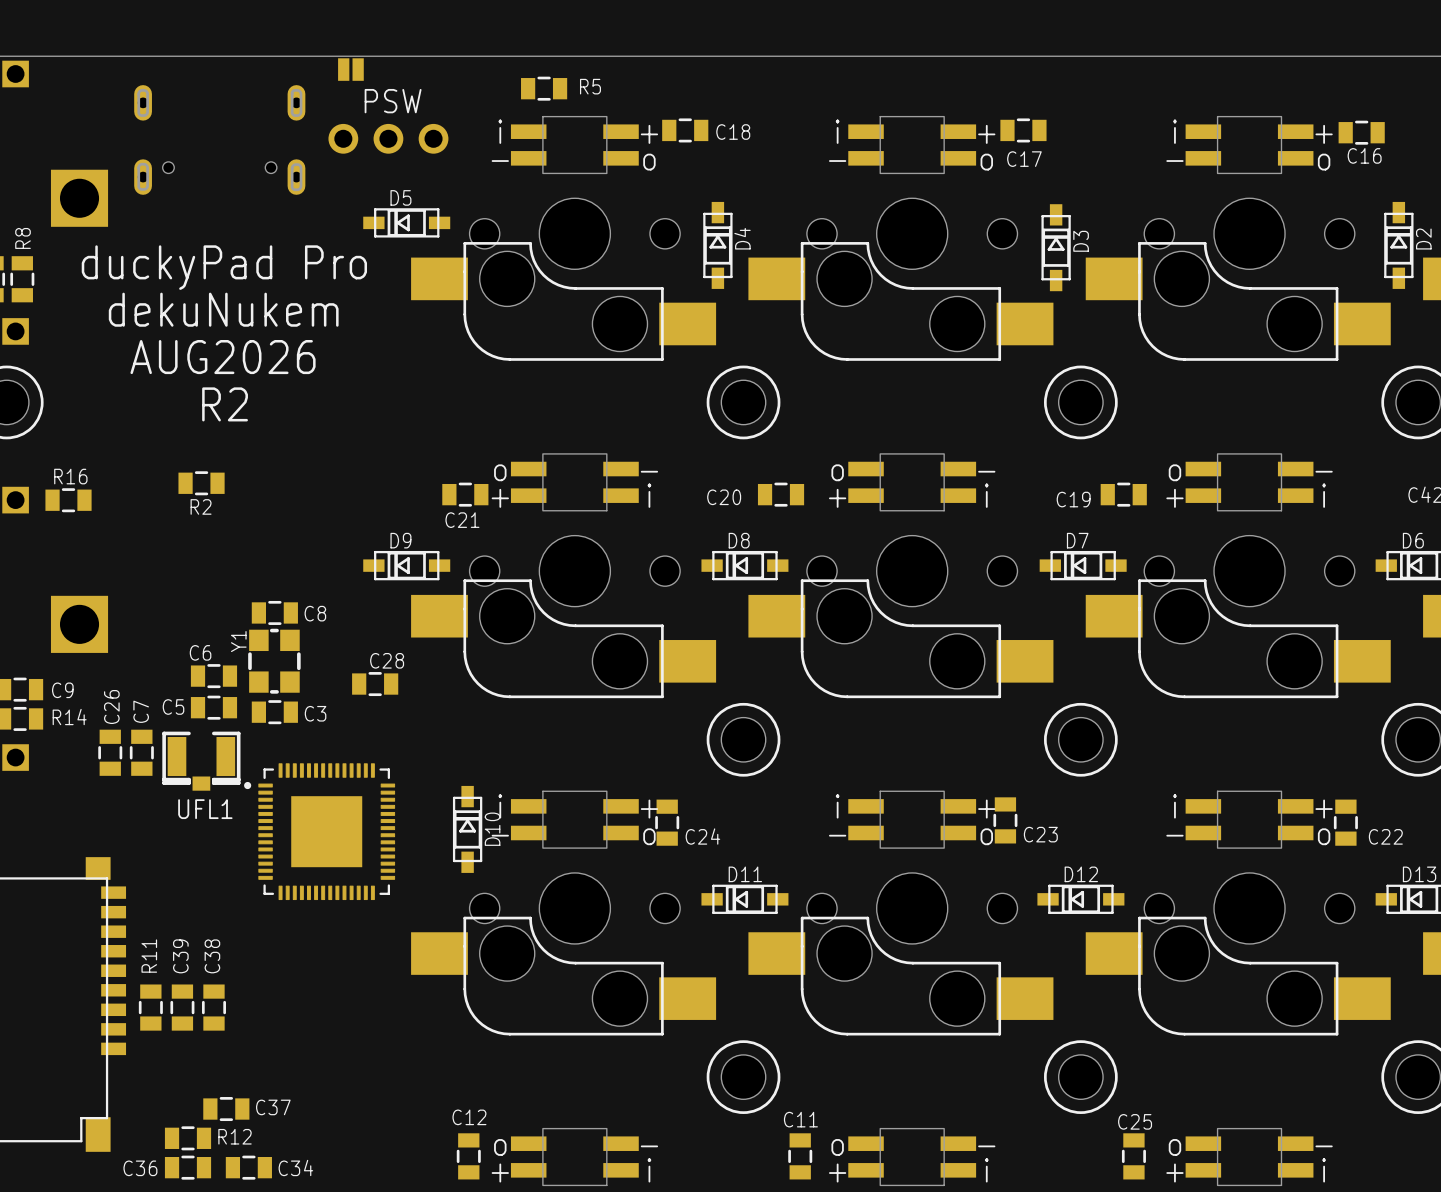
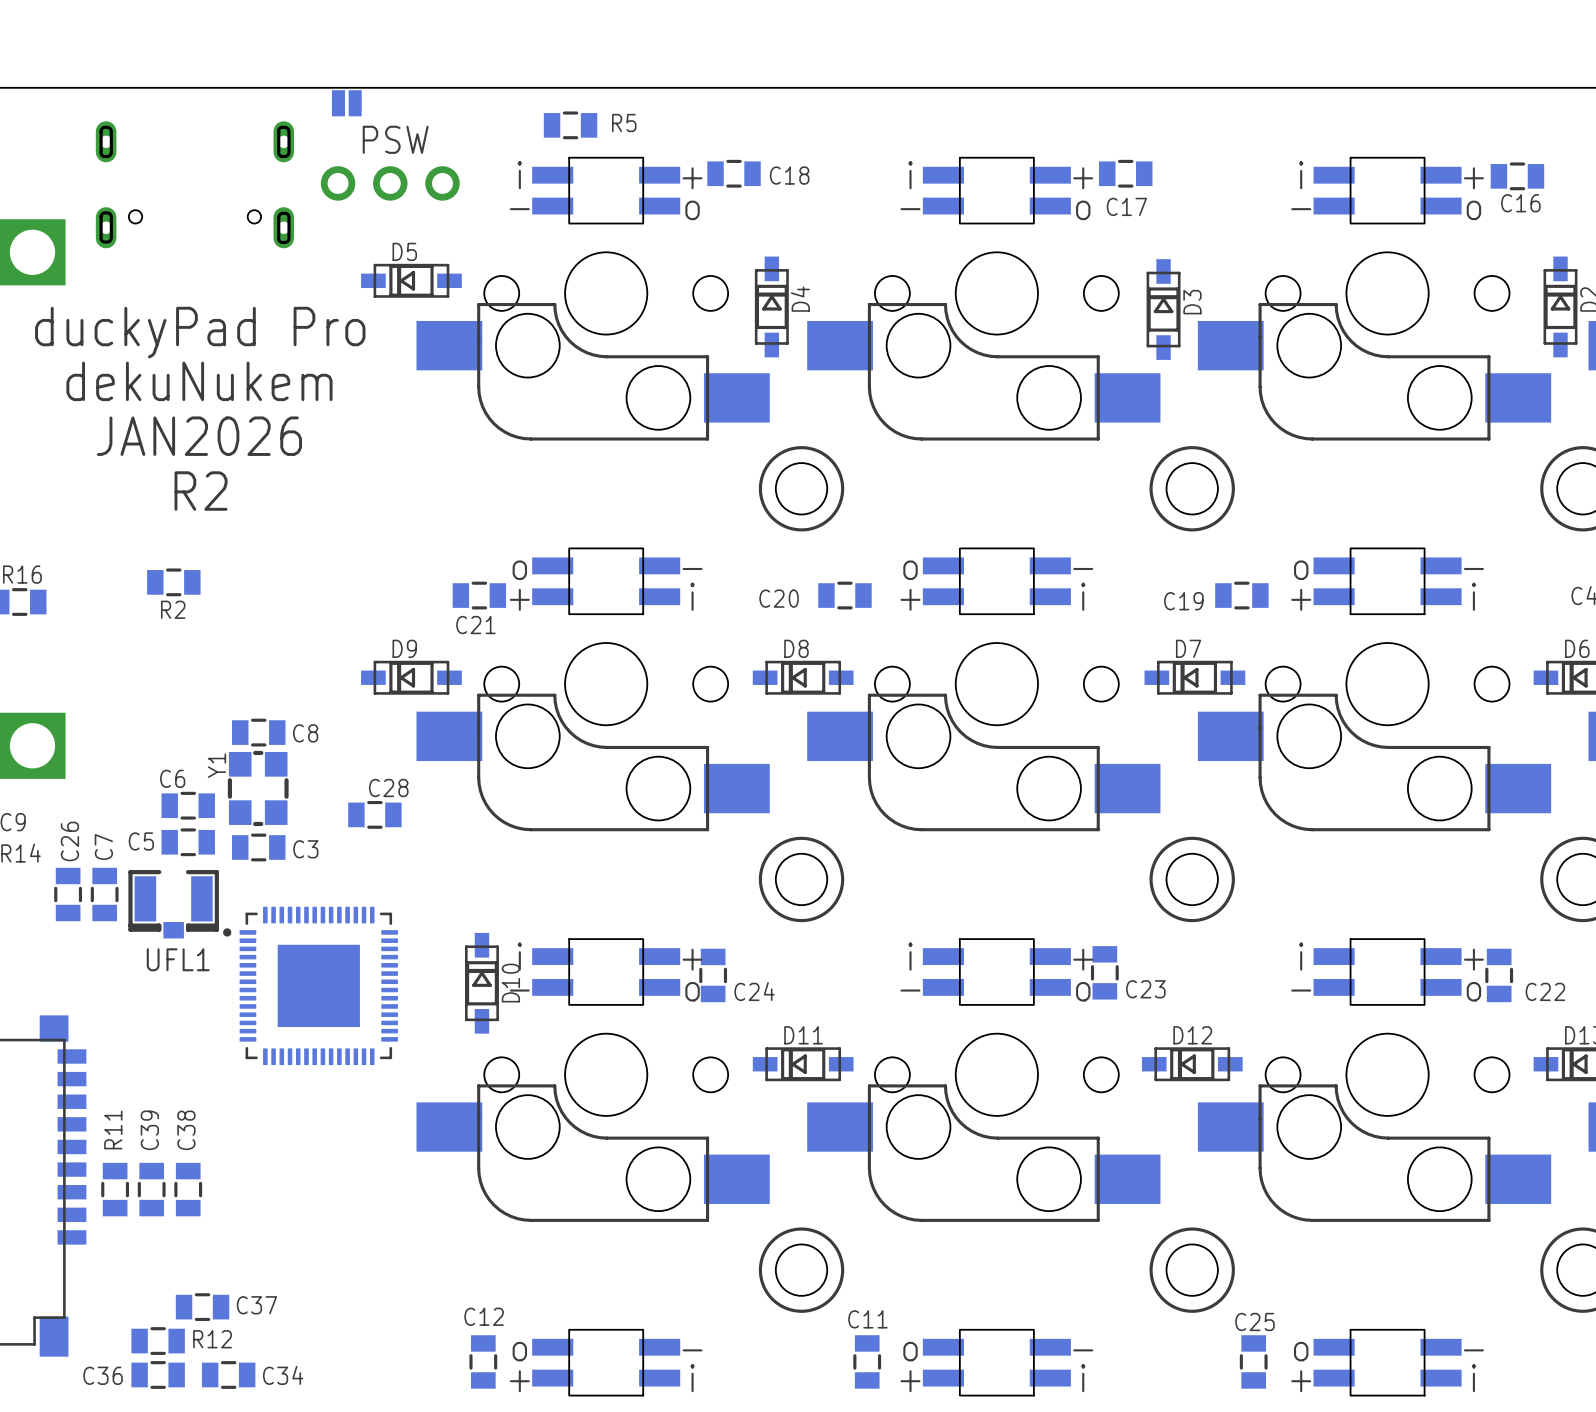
text: AUG2026 (223, 357) -> JAN2026 (199, 436)

